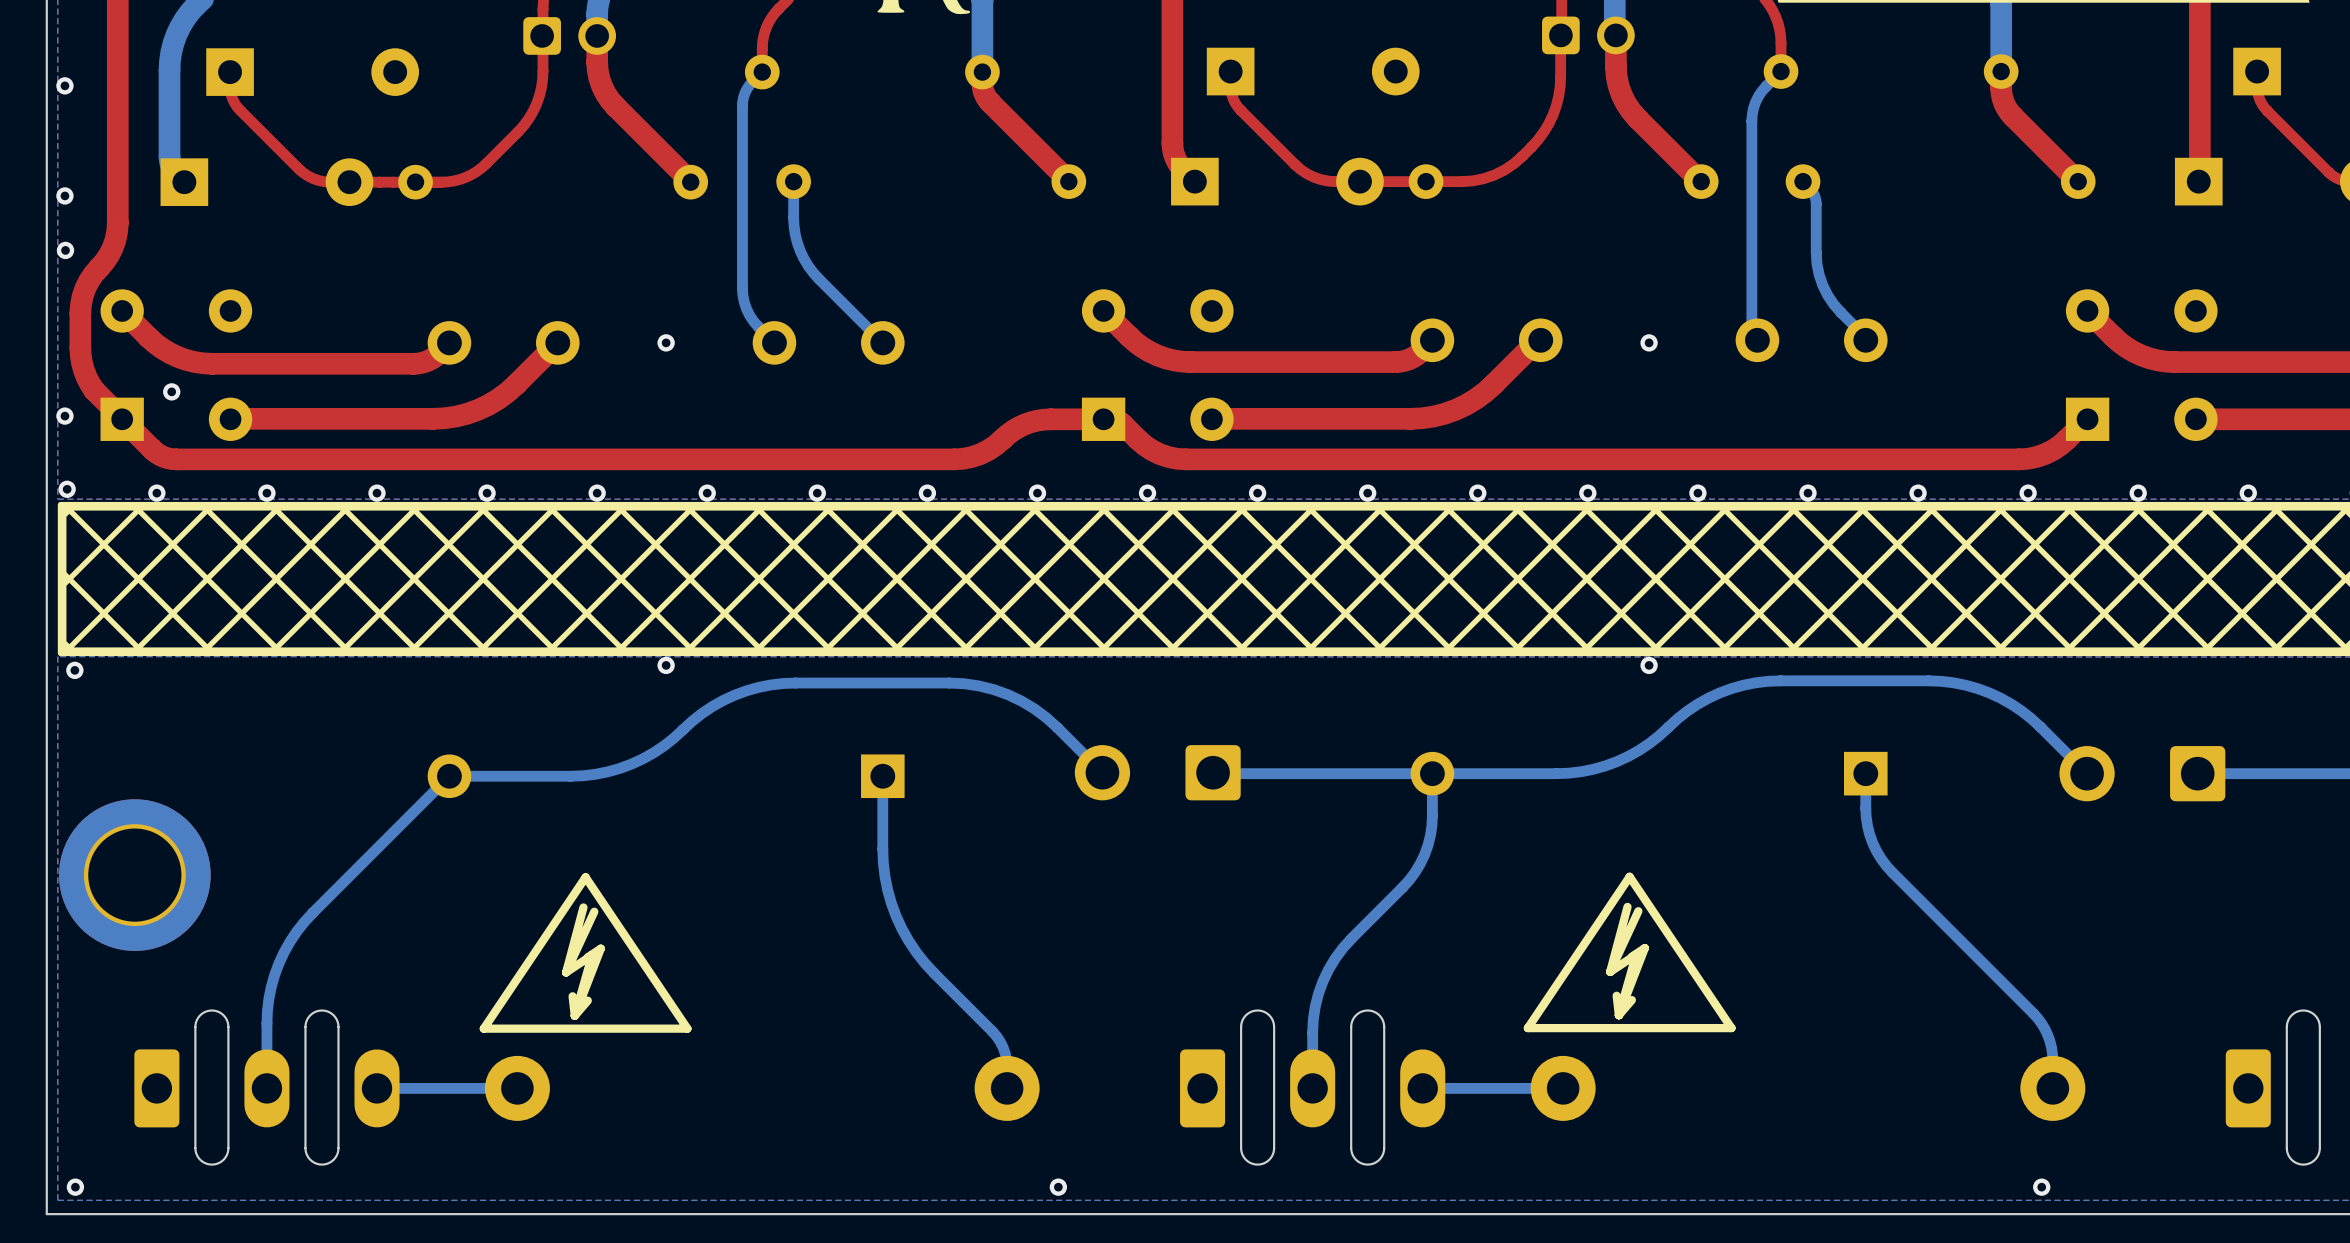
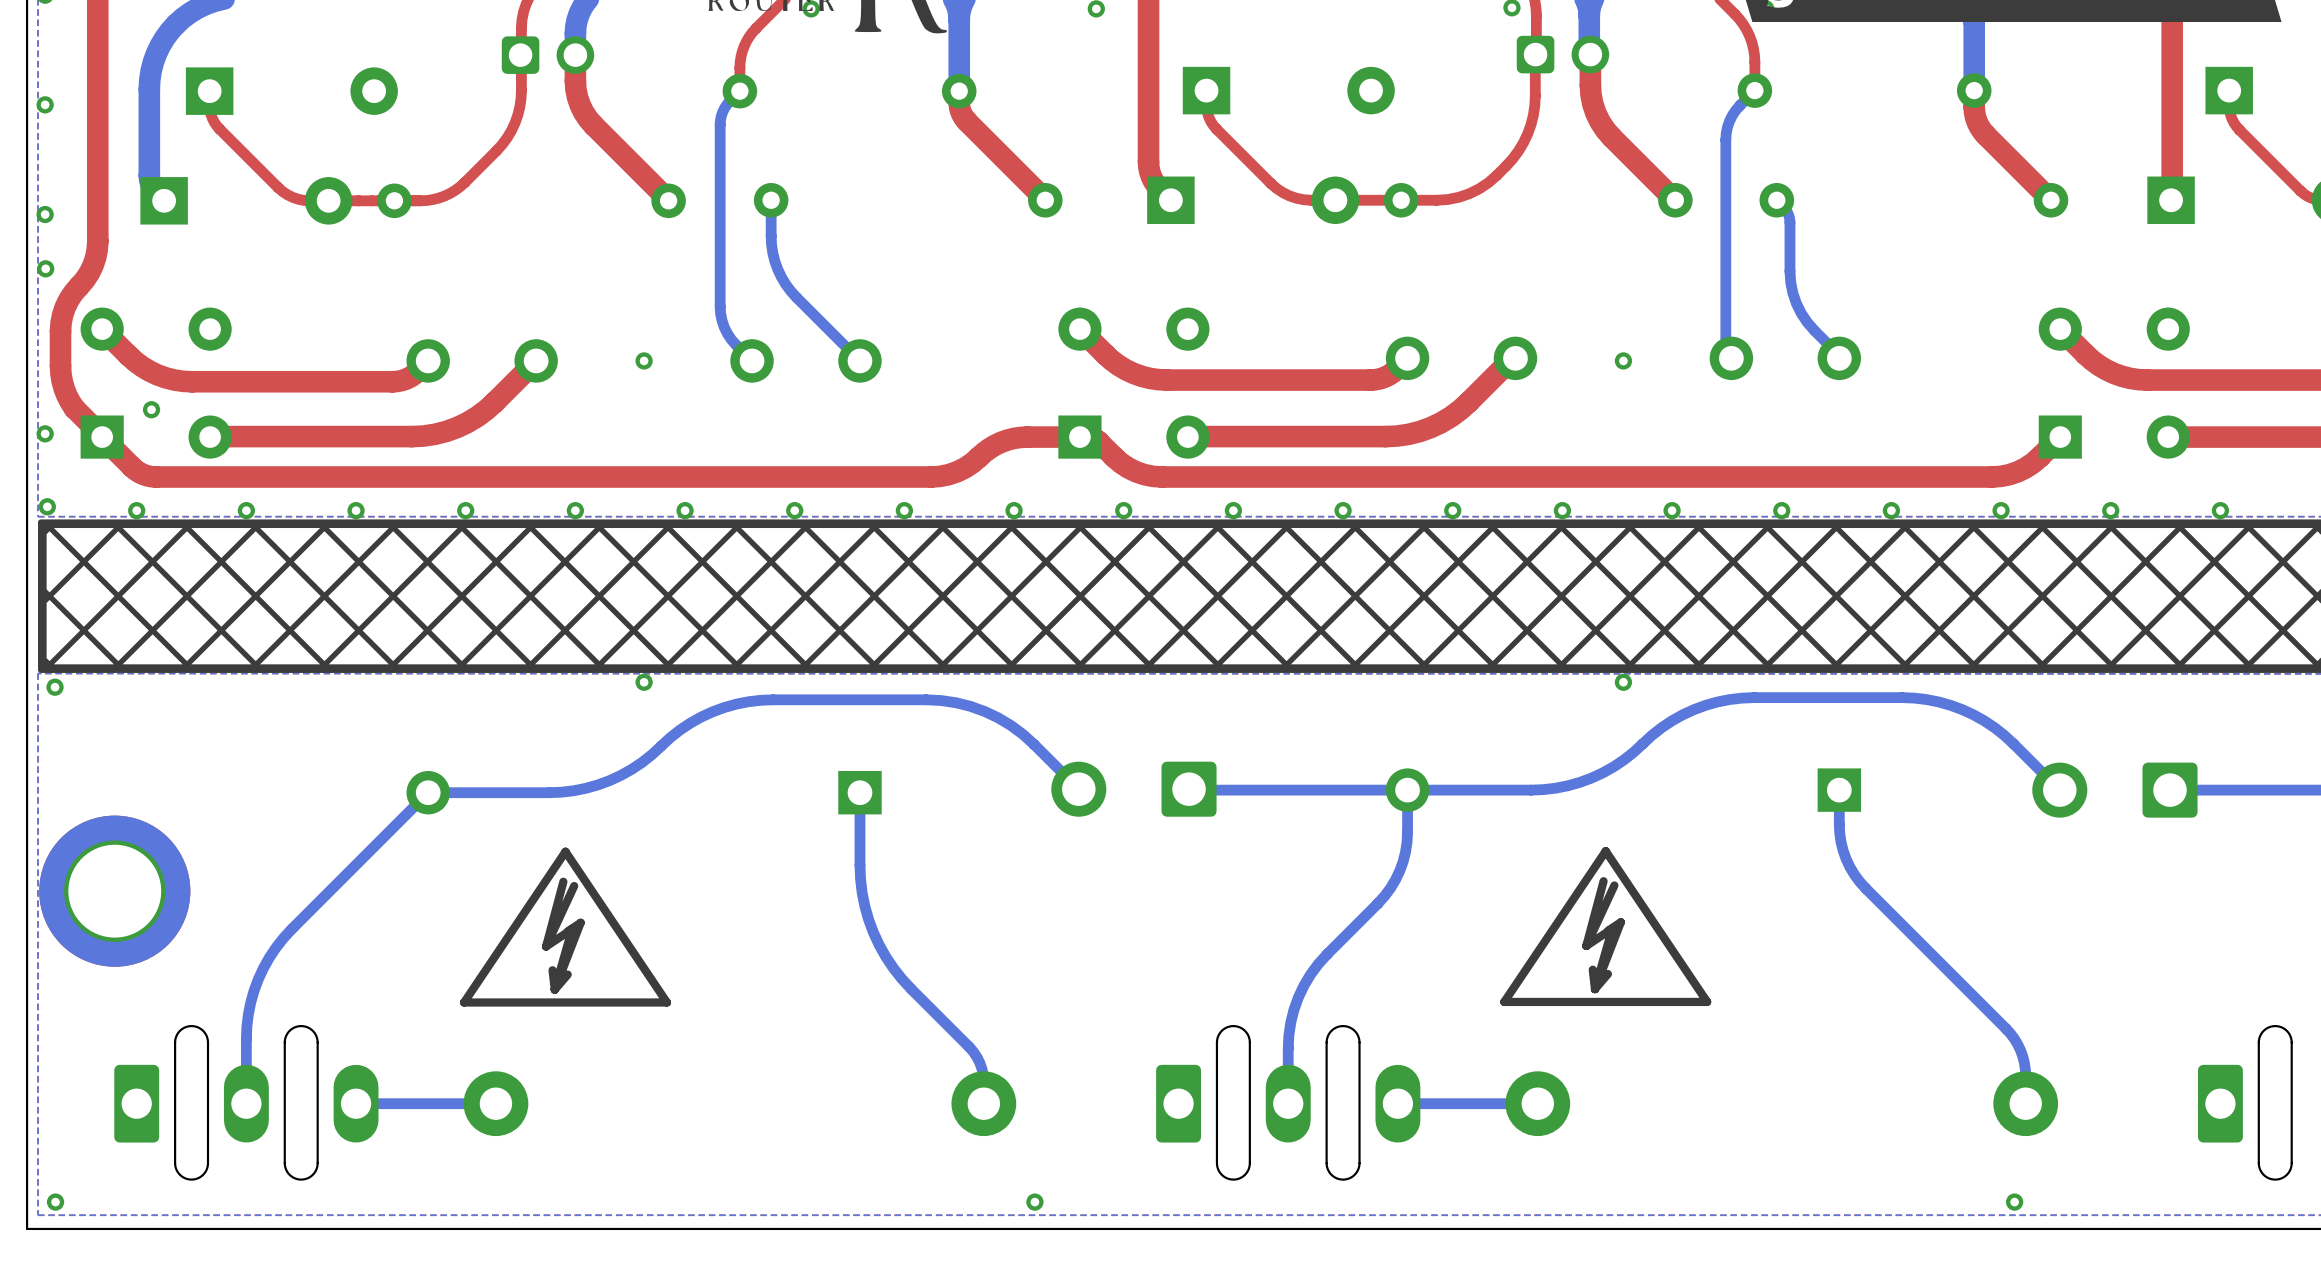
drawing position: (585, 952) -> (565, 927)
drawing position: (1629, 952) -> (1605, 926)

